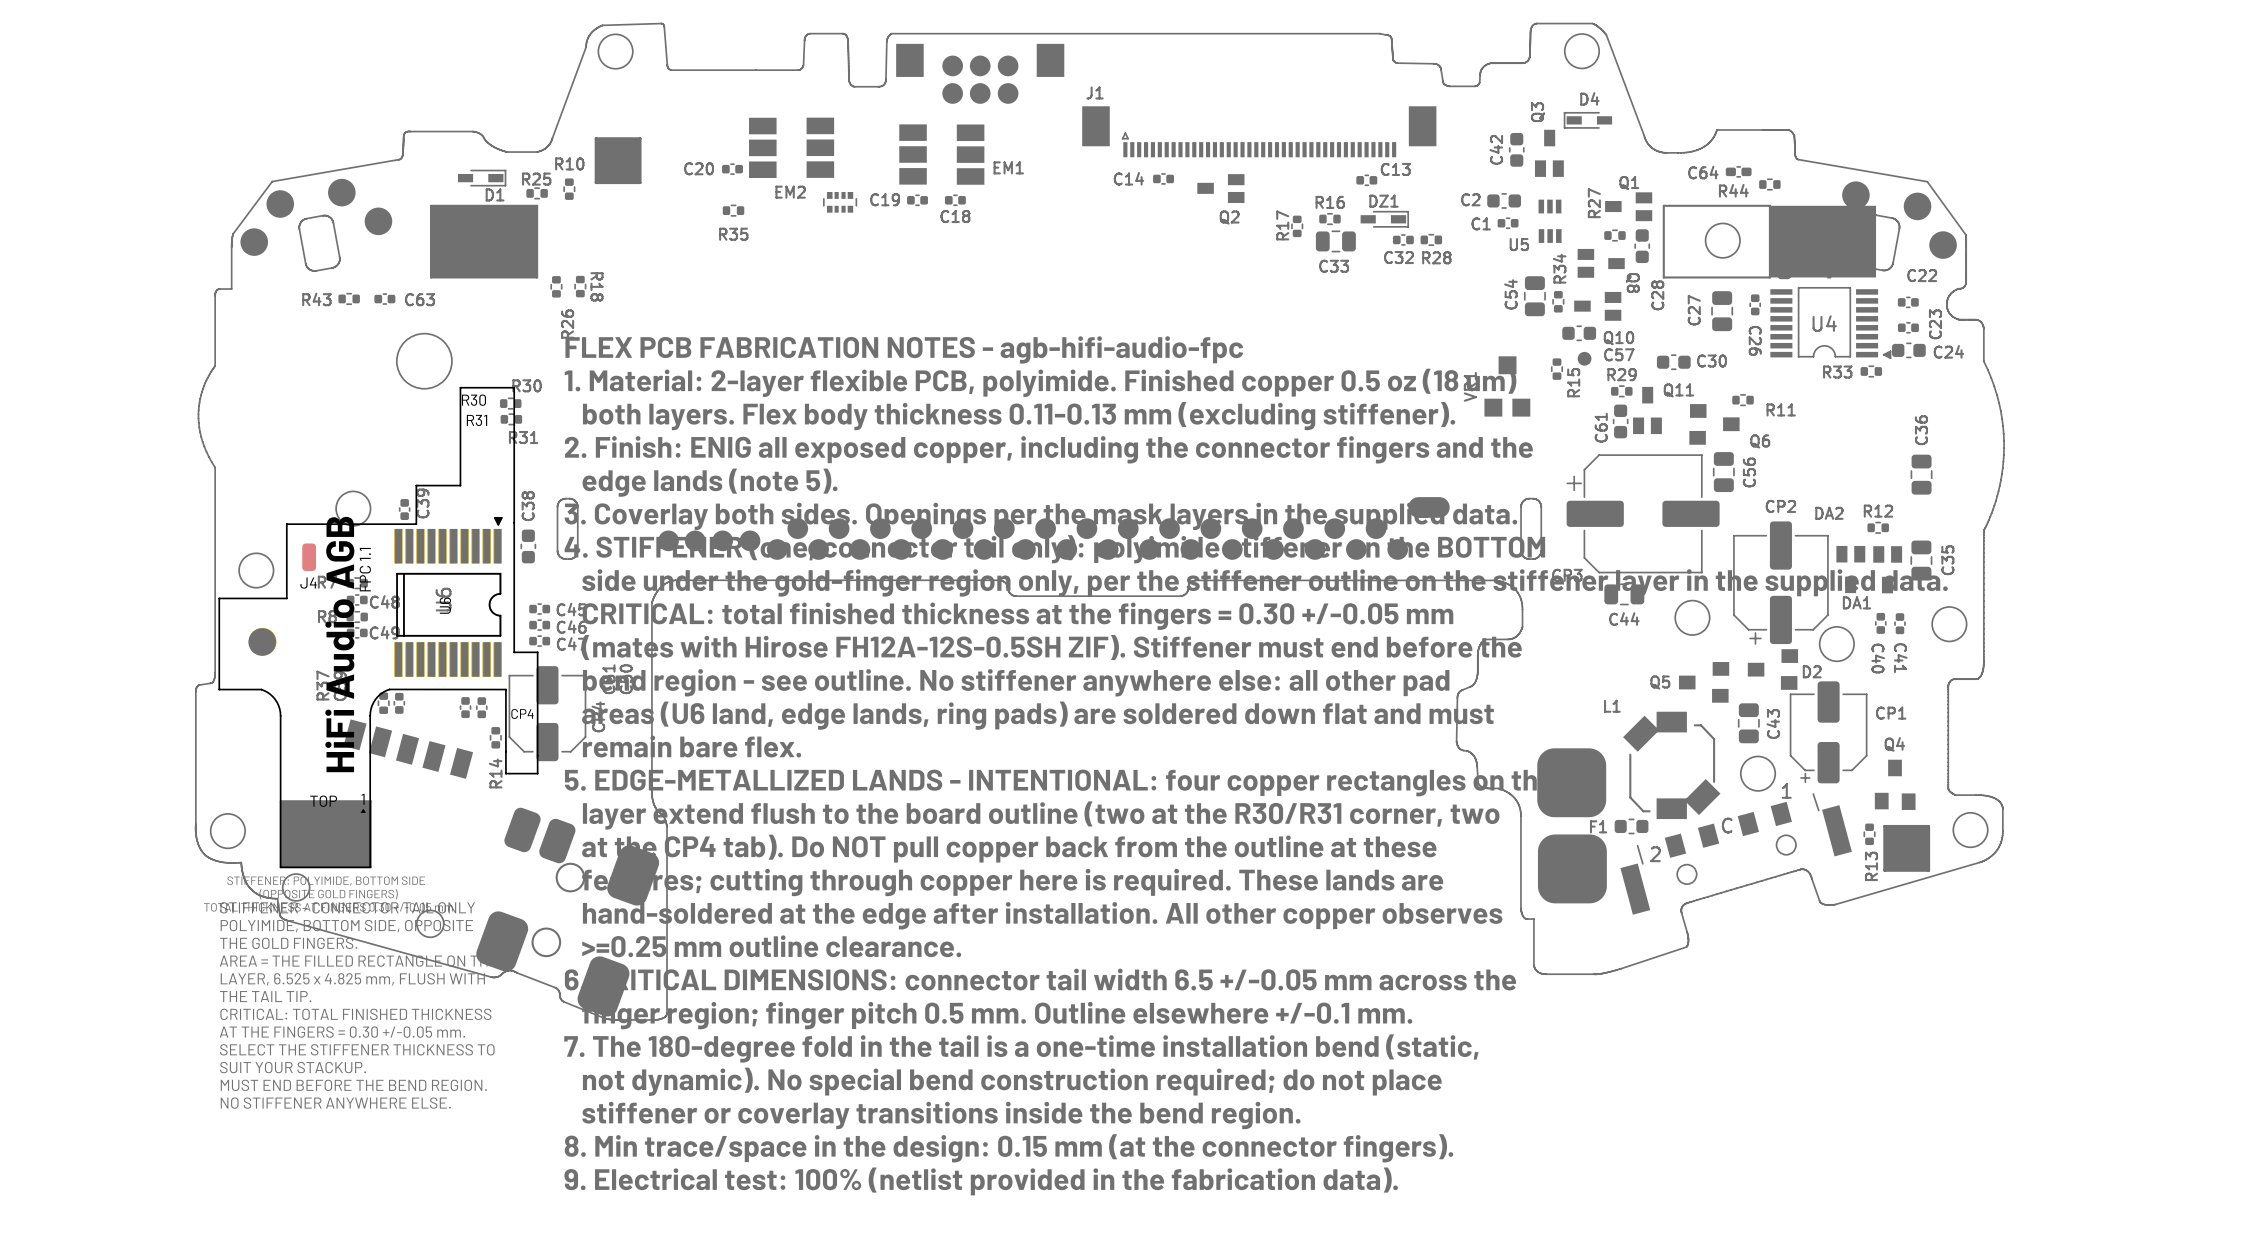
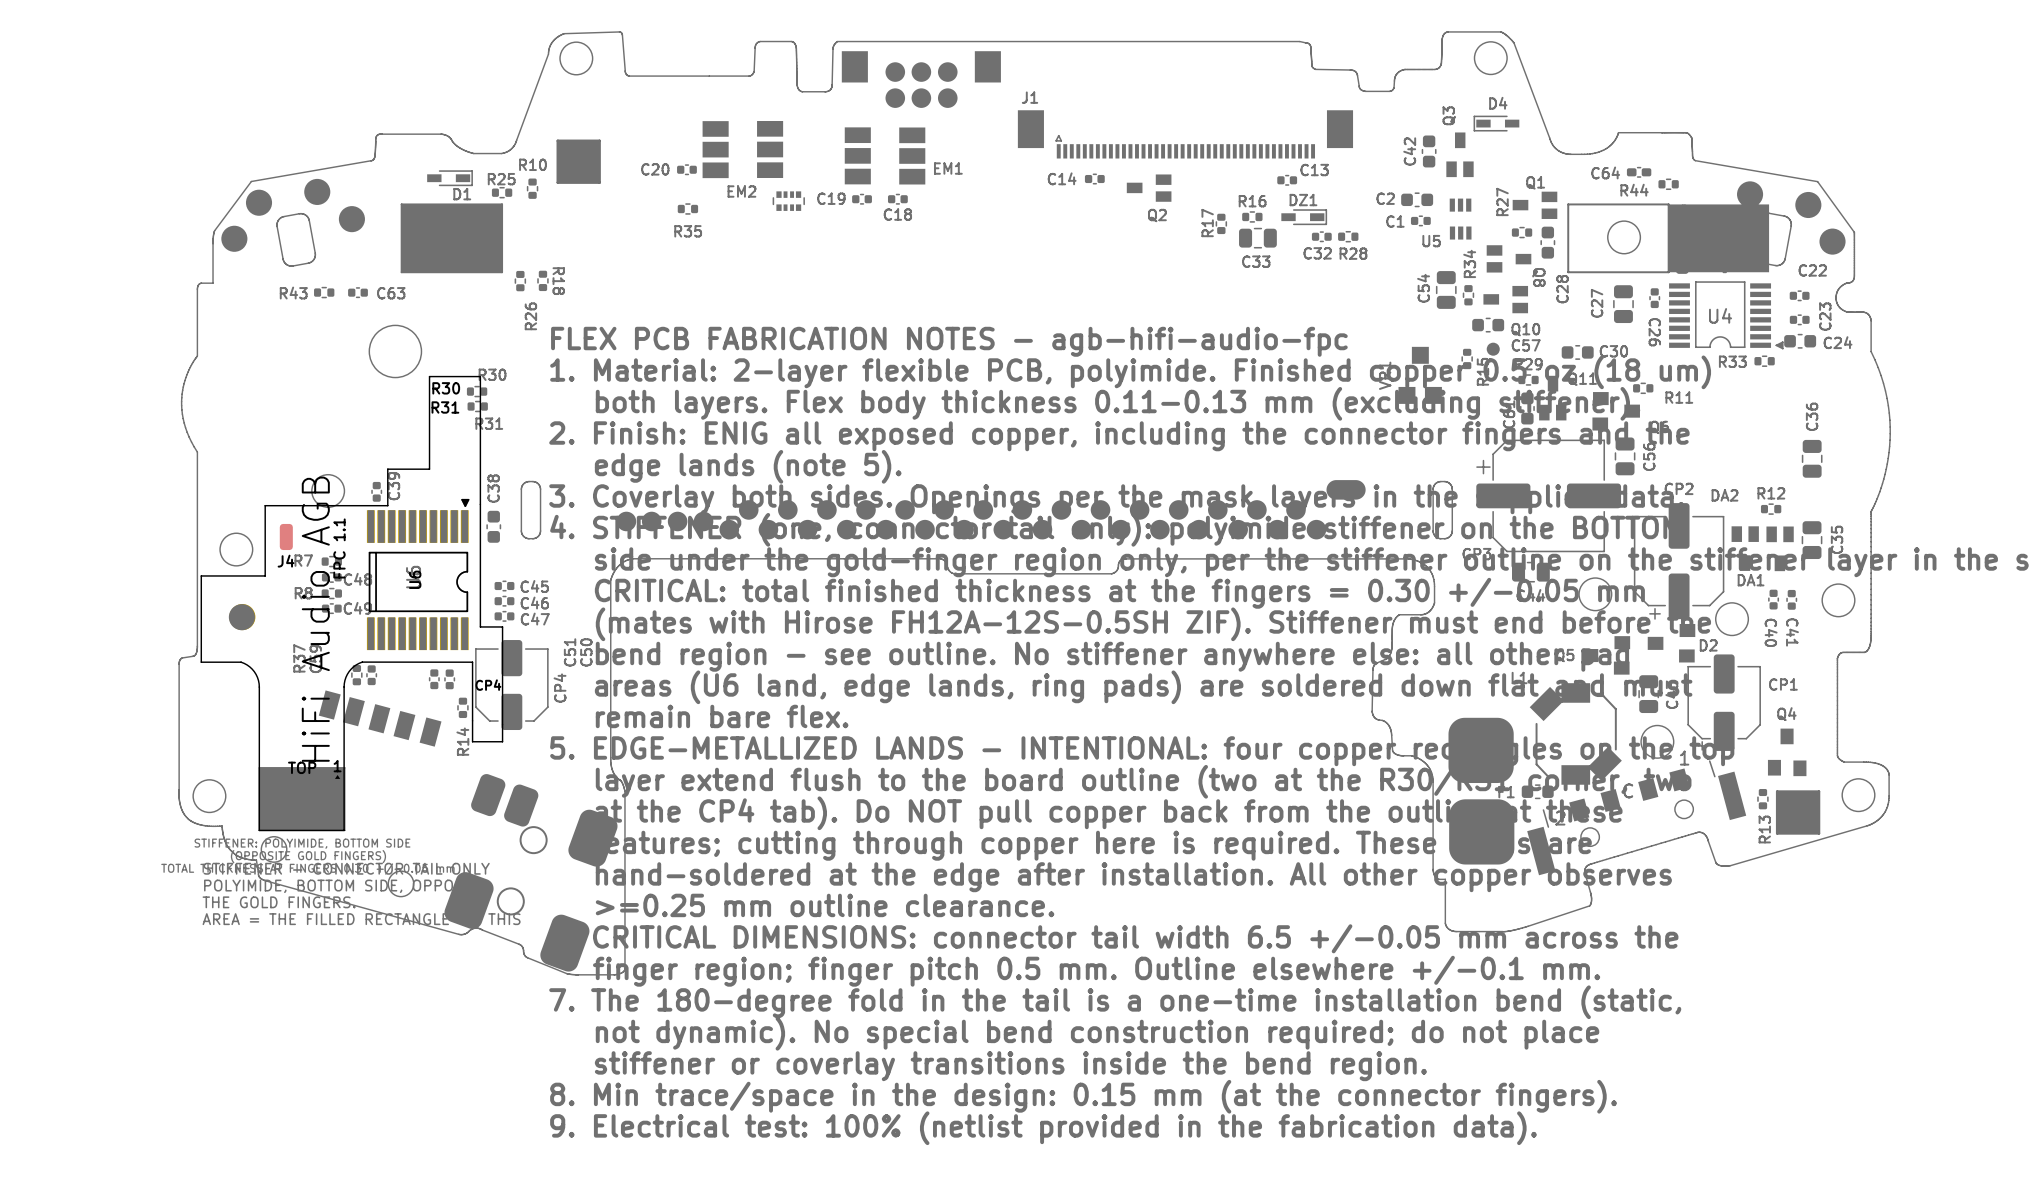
text: LAYER, 6.525 x 4.825 mm, FLUSH WITH (352, 979) -> none
text: THE TAIL TIP. (265, 996) -> none
text: CRITICAL: TOTAL FINISHED THICKNESS (355, 1014) -> none
text: AT THE FINGERS = 0.30 +/-0.05 mm. (342, 1032) -> none
text: SELECT THE STIFFENER THICKNESS TO (357, 1049) -> none
text: SUIT YOUR STACKUP. (293, 1067) -> none
text: MUST END BEFORE THE BEND REGION. (353, 1085) -> none
text: NO STIFFENER ANYWHERE ELSE. (335, 1103) -> none

